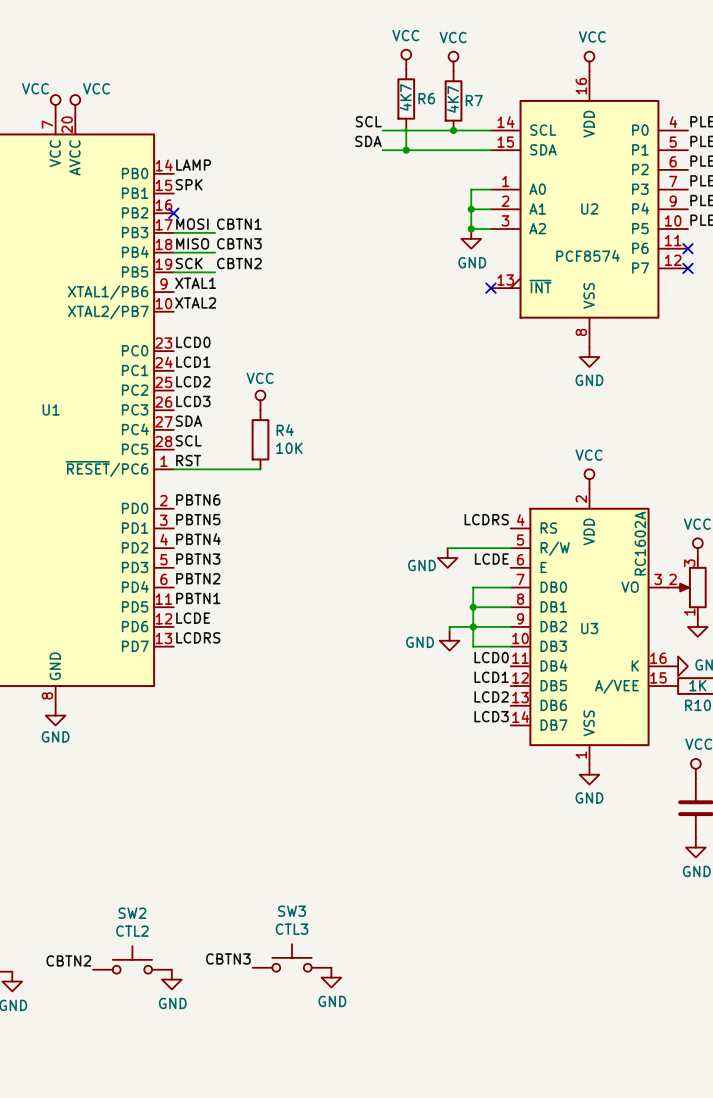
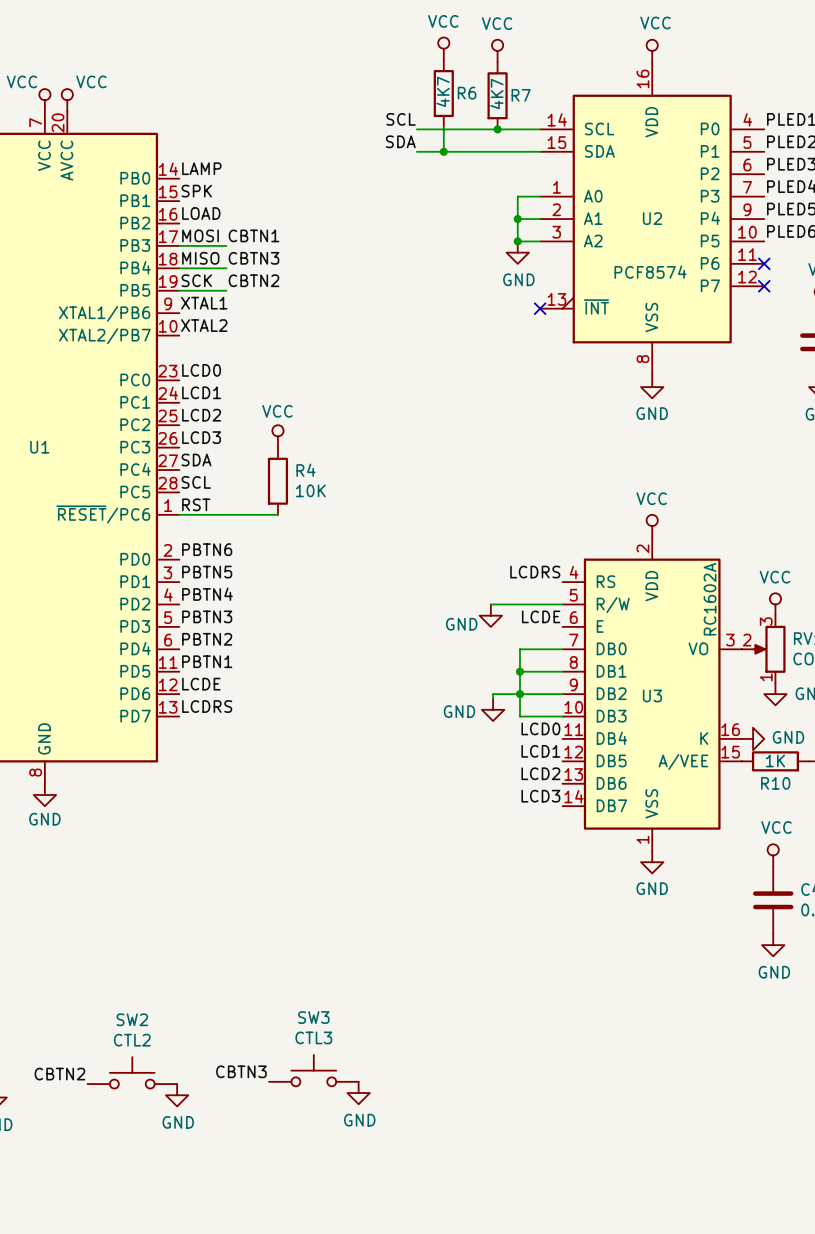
label: none -> LOAD (201, 213)
no-connect mark: (173, 213) -> none

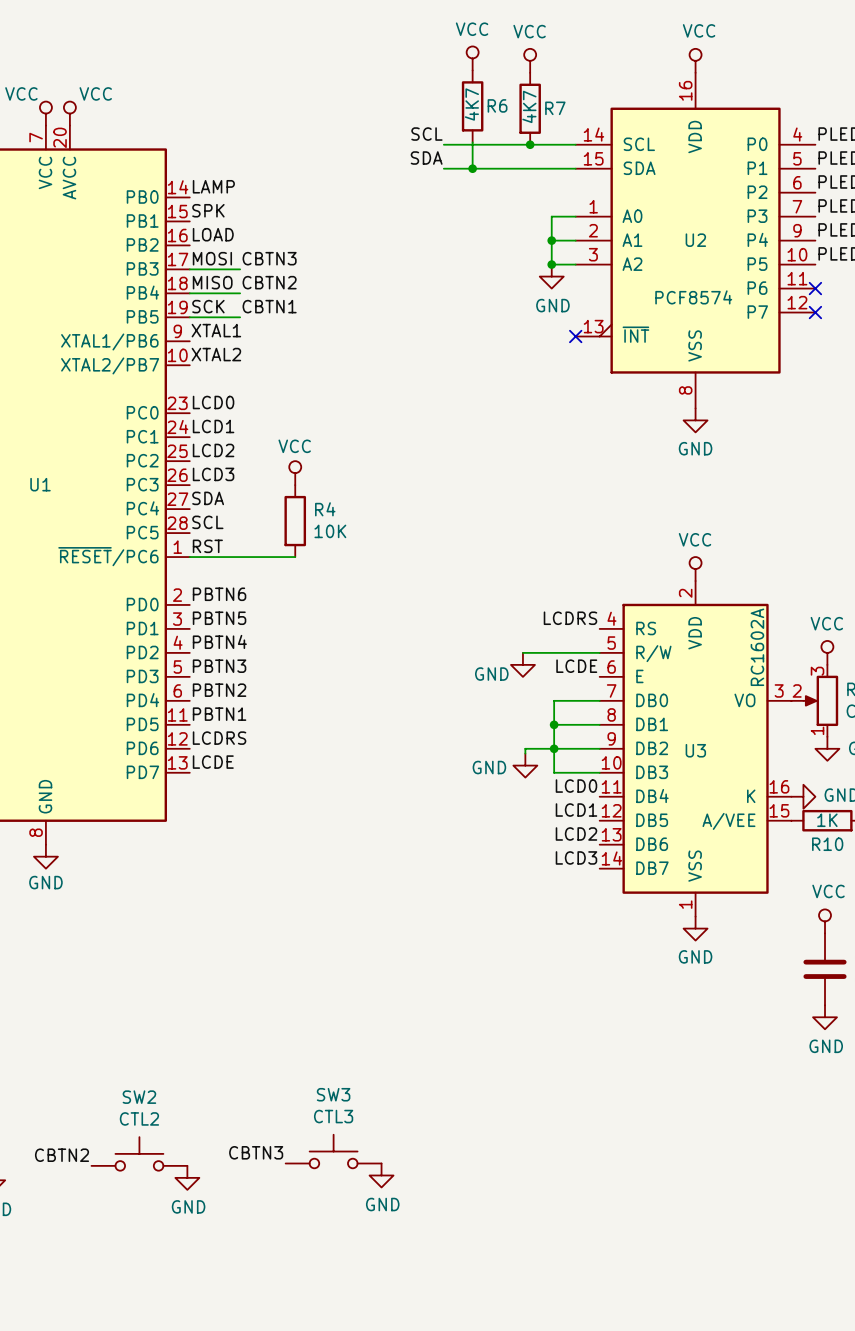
label: CBTN1 (253, 235) -> CBTN3 (269, 258)
label: CBTN3 (253, 258) -> CBTN2 (269, 282)
label: CBTN2 (253, 280) -> CBTN1 (269, 306)
label: LCDE (201, 684) -> LCDRS (219, 738)
label: LCDRS (207, 706) -> LCDE (213, 762)

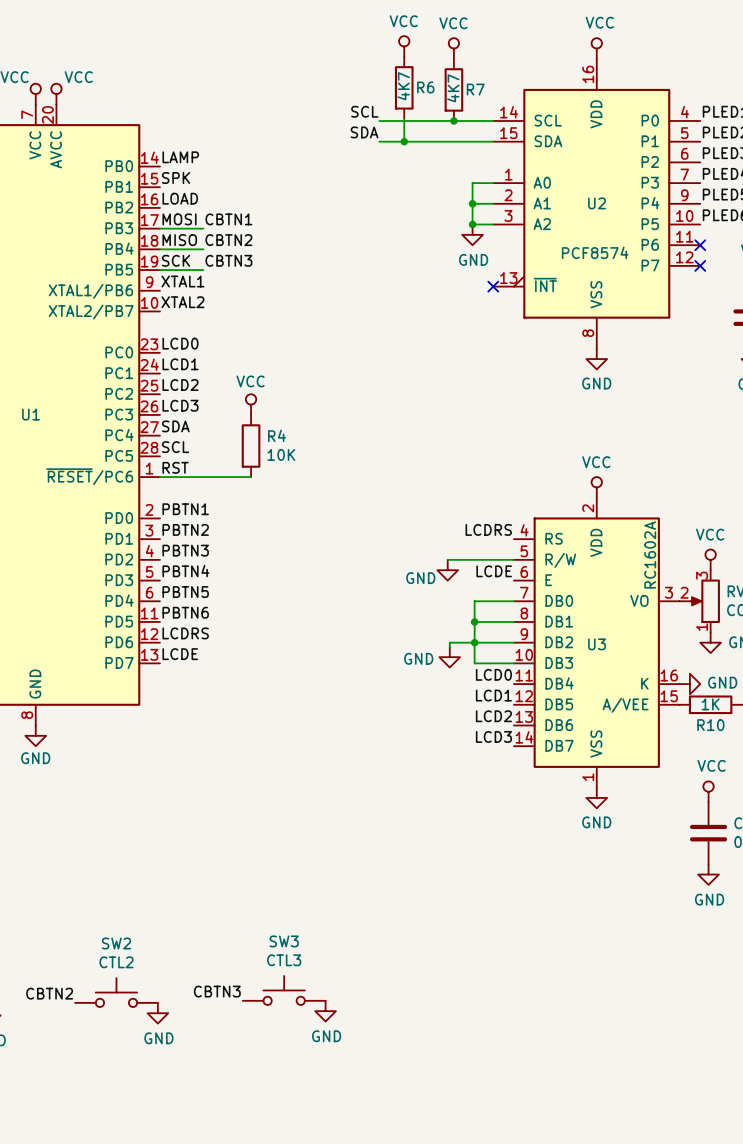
label: CBTN3 (269, 258) -> CBTN1 (228, 219)
label: CBTN1 (269, 306) -> CBTN3 (228, 260)
label: PBTN6 (219, 594) -> PBTN1 (185, 509)
label: PBTN5 (219, 618) -> PBTN2 (185, 529)
label: PBTN4 (219, 641) -> PBTN3 (185, 550)
label: PBTN3 (219, 666) -> PBTN4 (185, 571)
label: PBTN2 (219, 690) -> PBTN5 (185, 592)
label: PBTN1 (219, 714) -> PBTN6 (185, 612)

